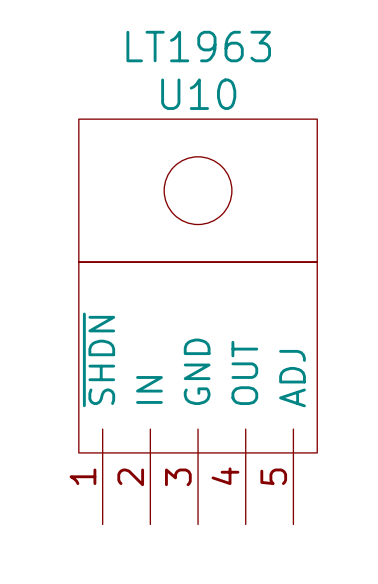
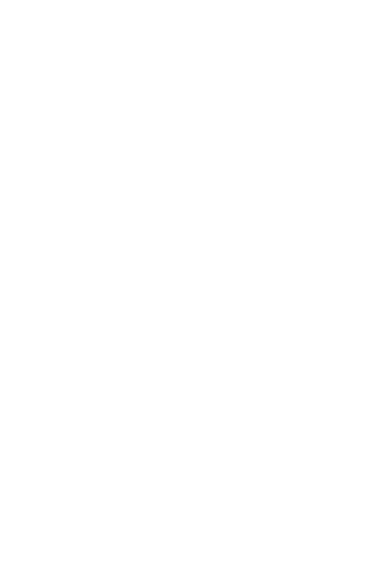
U10: LT1963 (198, 321) -> none

